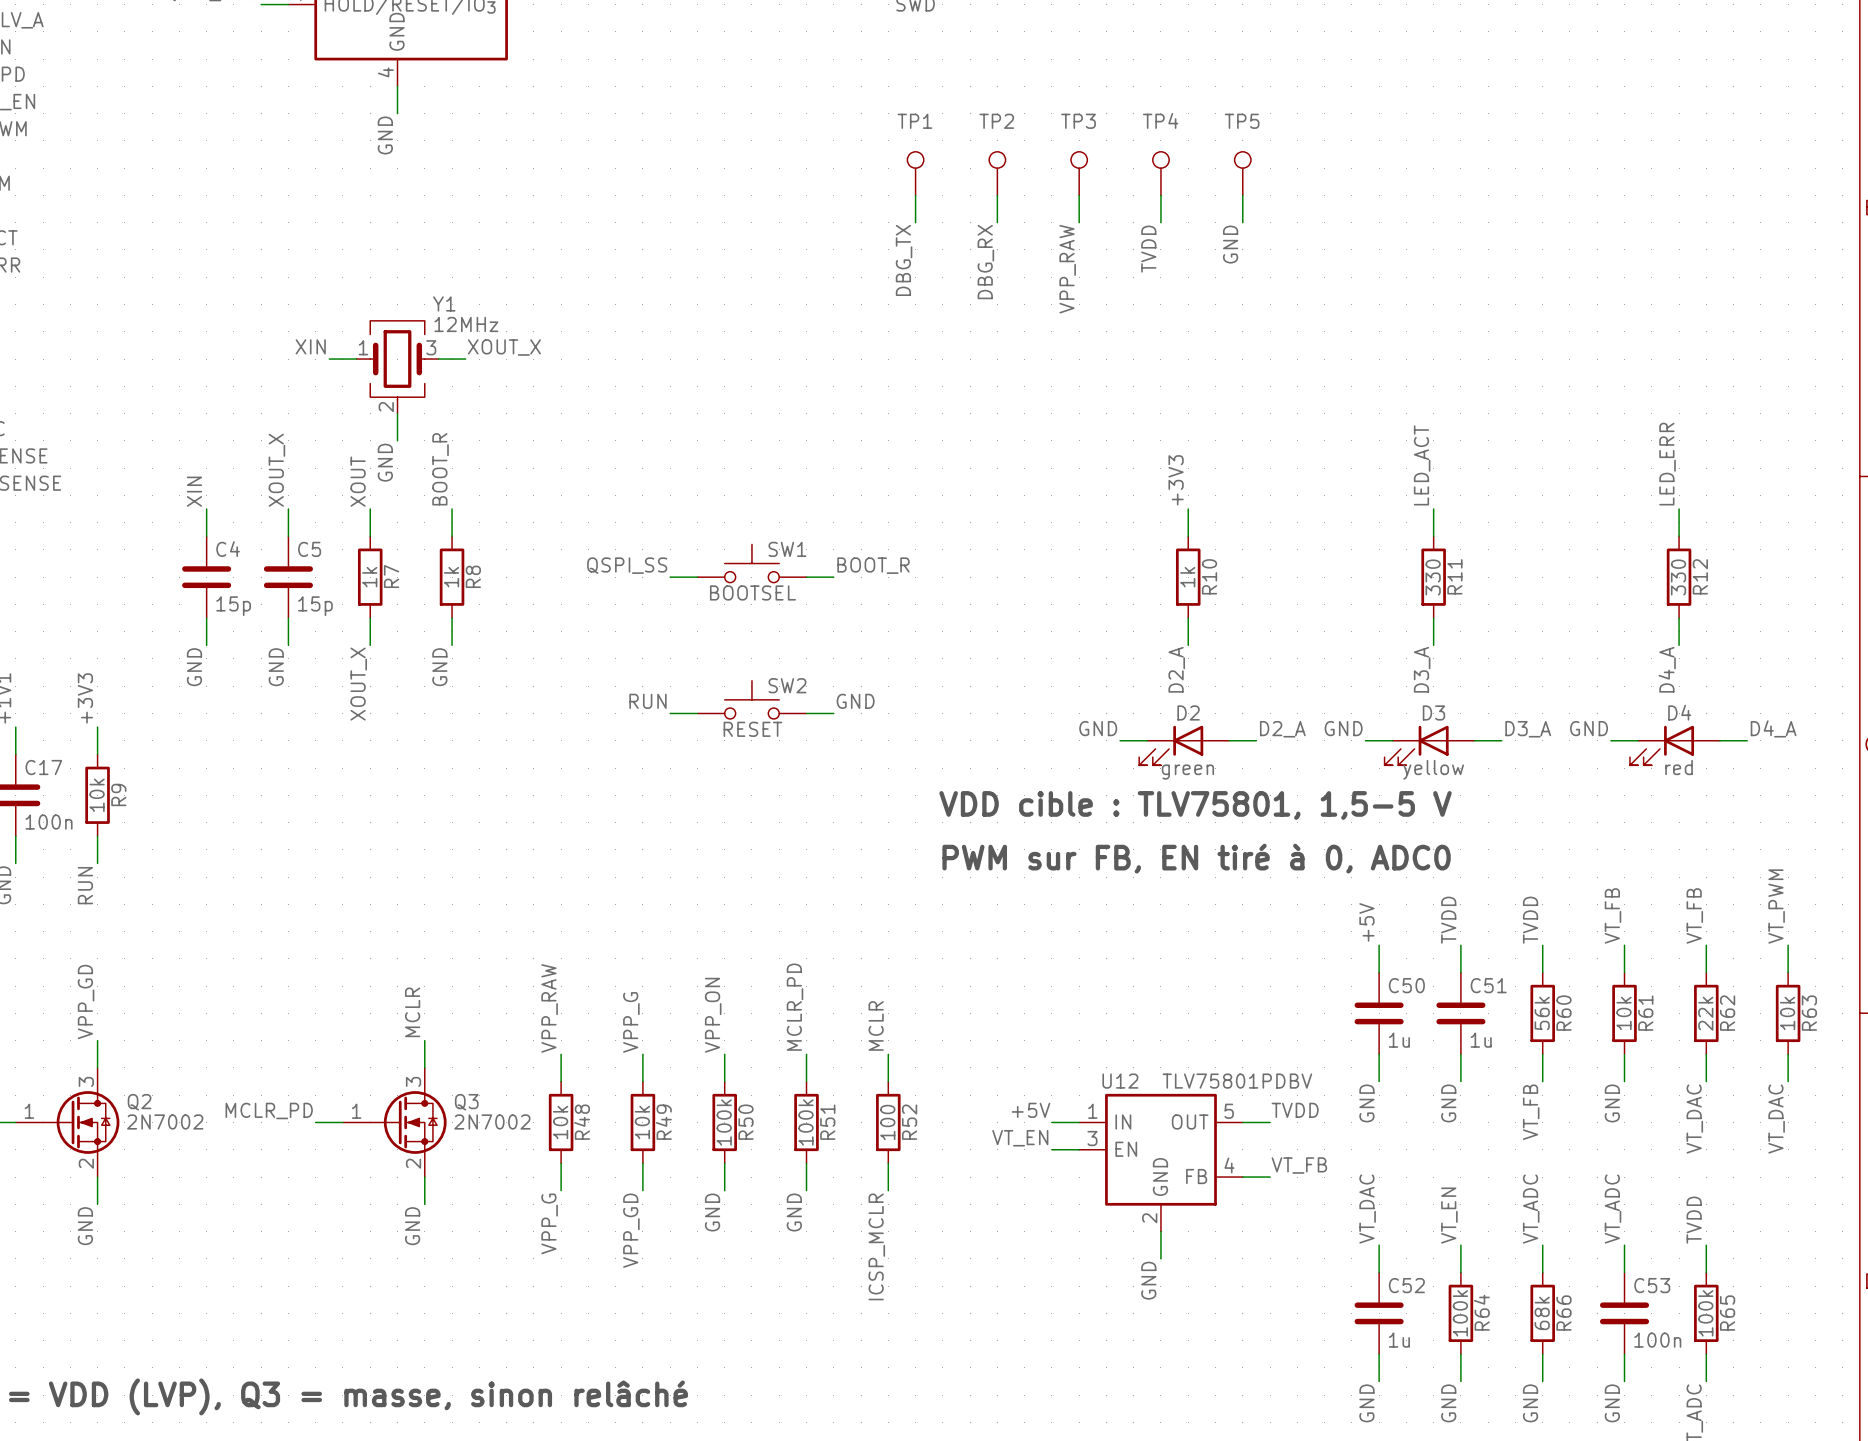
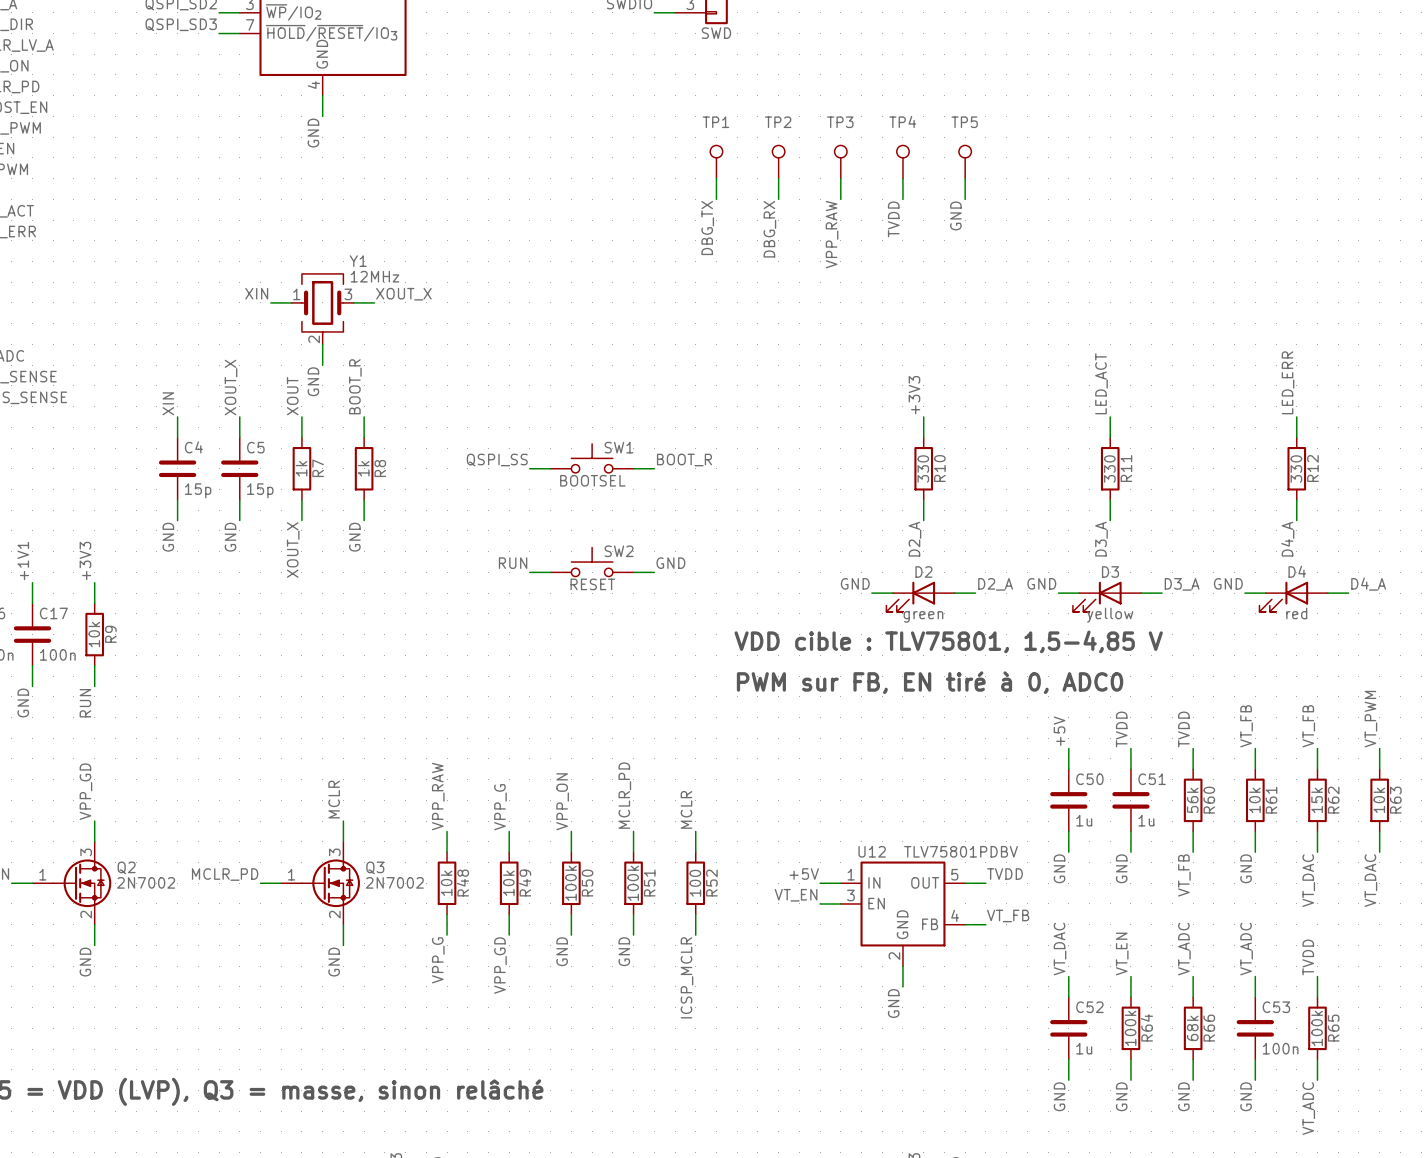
R10 value: 1k (1187, 577) -> 330 (923, 469)
text: VDD cible : TLV75801, 1,5-5 V (1195, 805) -> VDD cible : TLV75801, 1,5-4,85 V (948, 641)
R62 value: 22k (1705, 1013) -> 15k (1317, 800)

